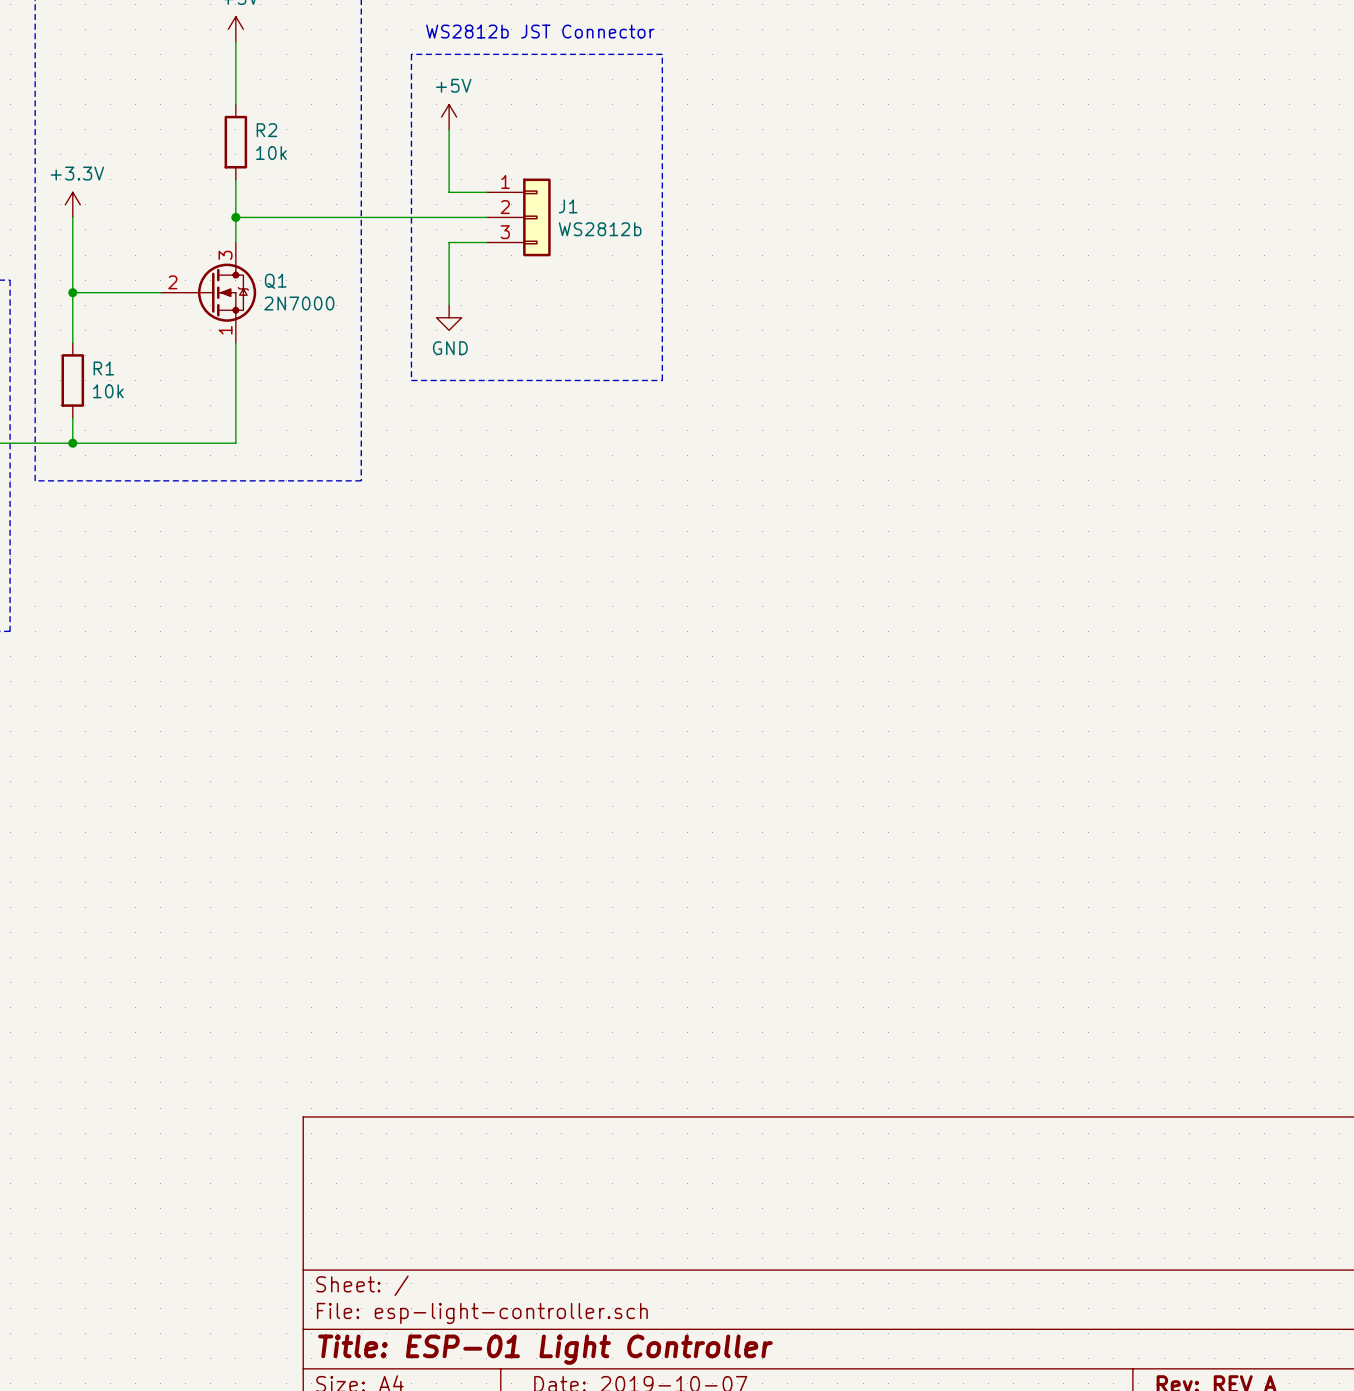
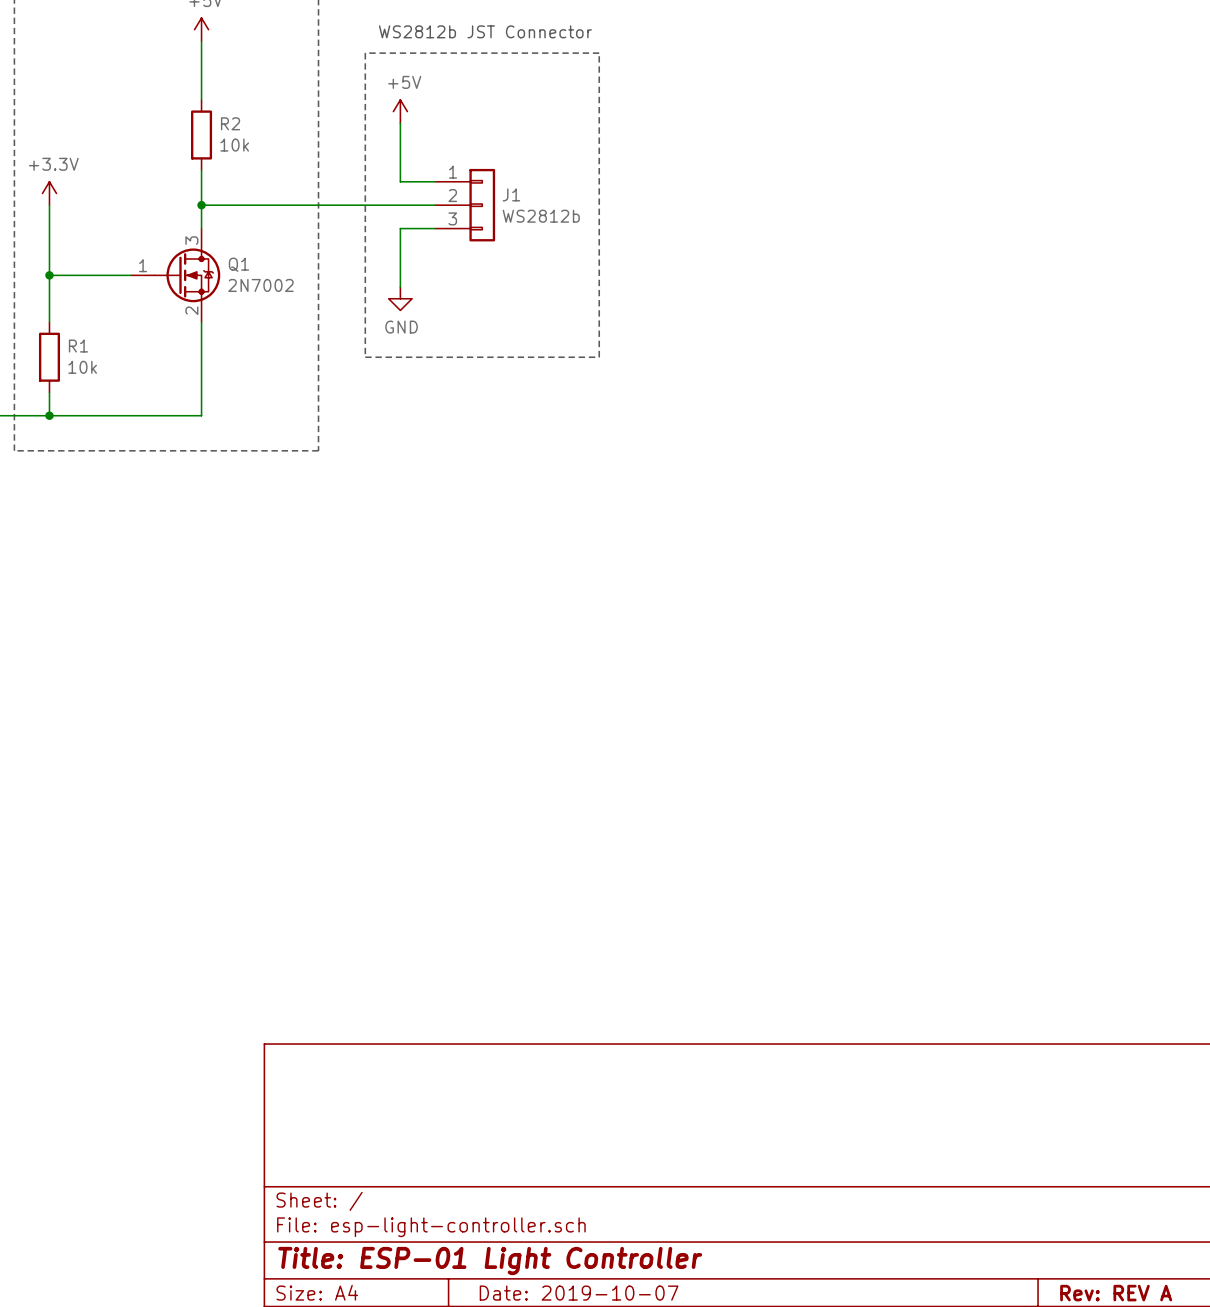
Q1 symbol: [160, 242, 257, 343] -> [131, 228, 221, 323]
Q1 value: 2N7000 (299, 303) -> 2N7002 (260, 285)

